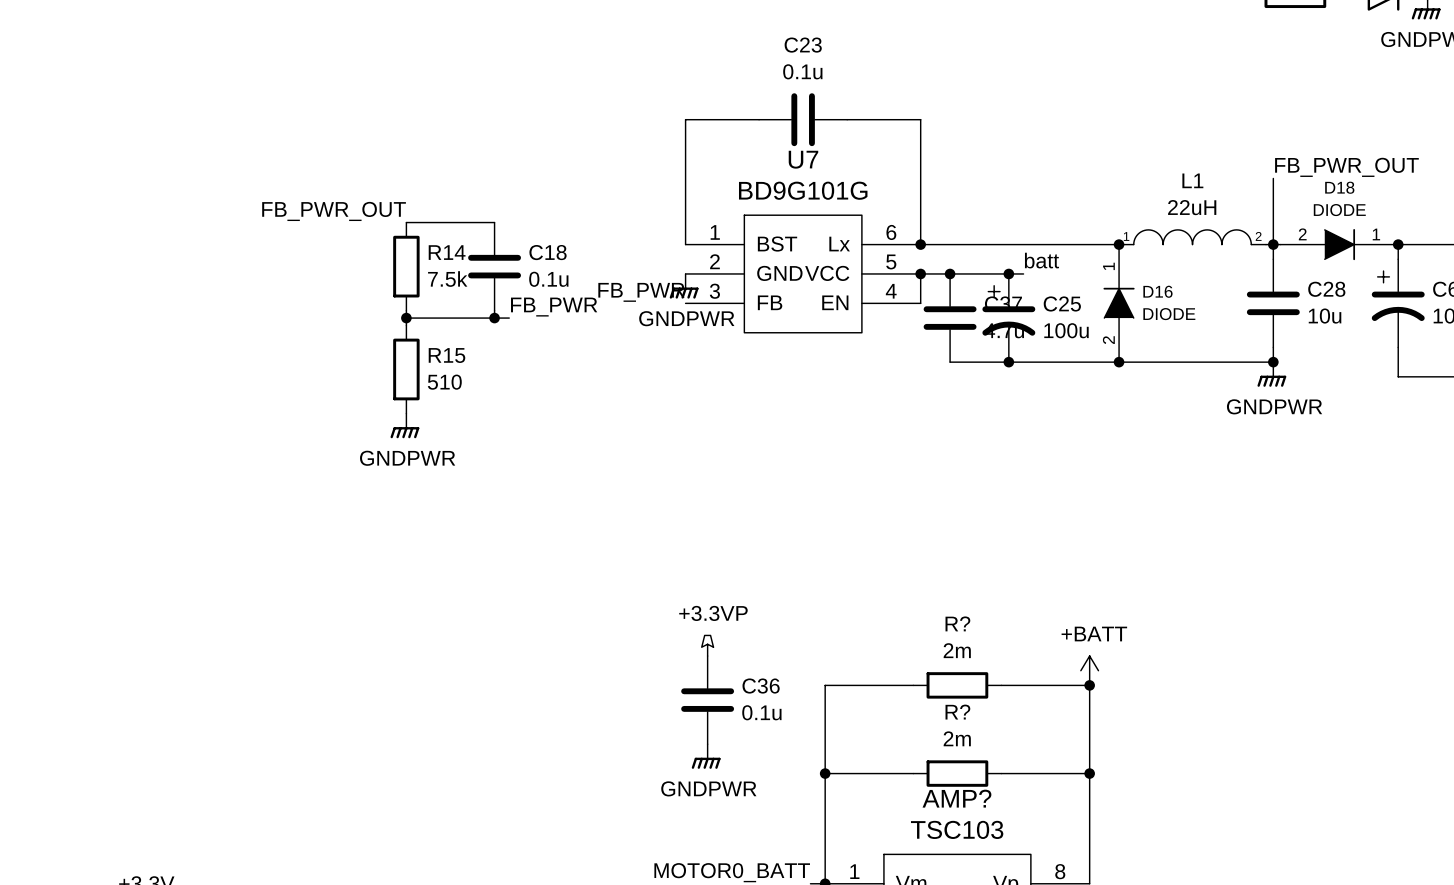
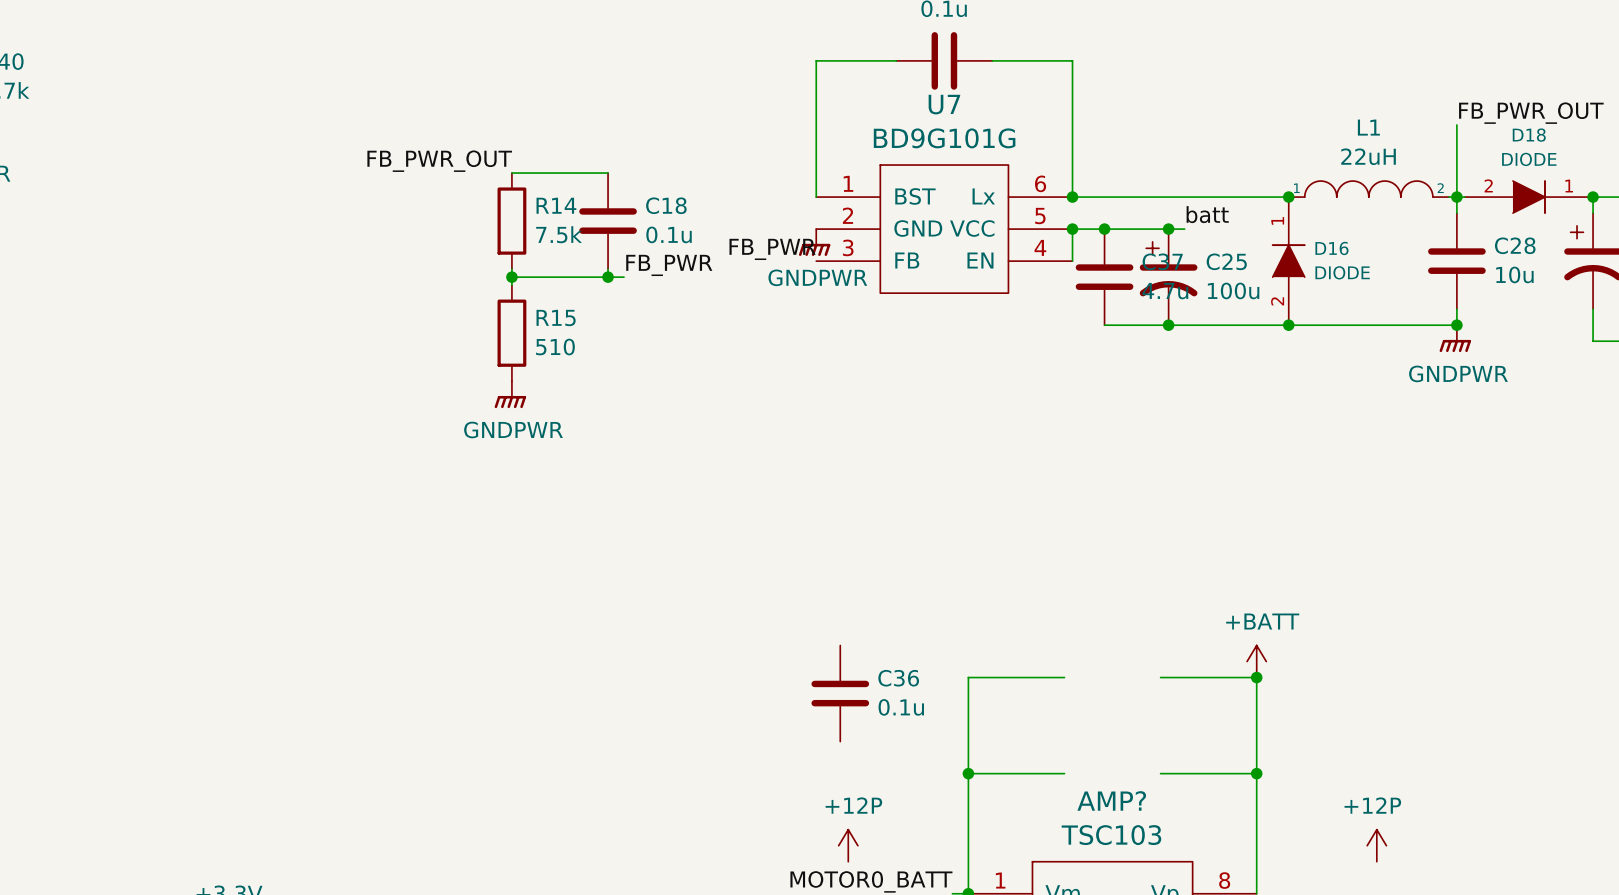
power symbol: +3.3VP (707, 645) -> none
R?: 2m (957, 685) -> none
power symbol: GNDPWR (706, 756) -> none
R?: 2m (957, 773) -> none
power symbol: none -> +12P (848, 845)
power symbol: none -> +12P (1376, 845)

